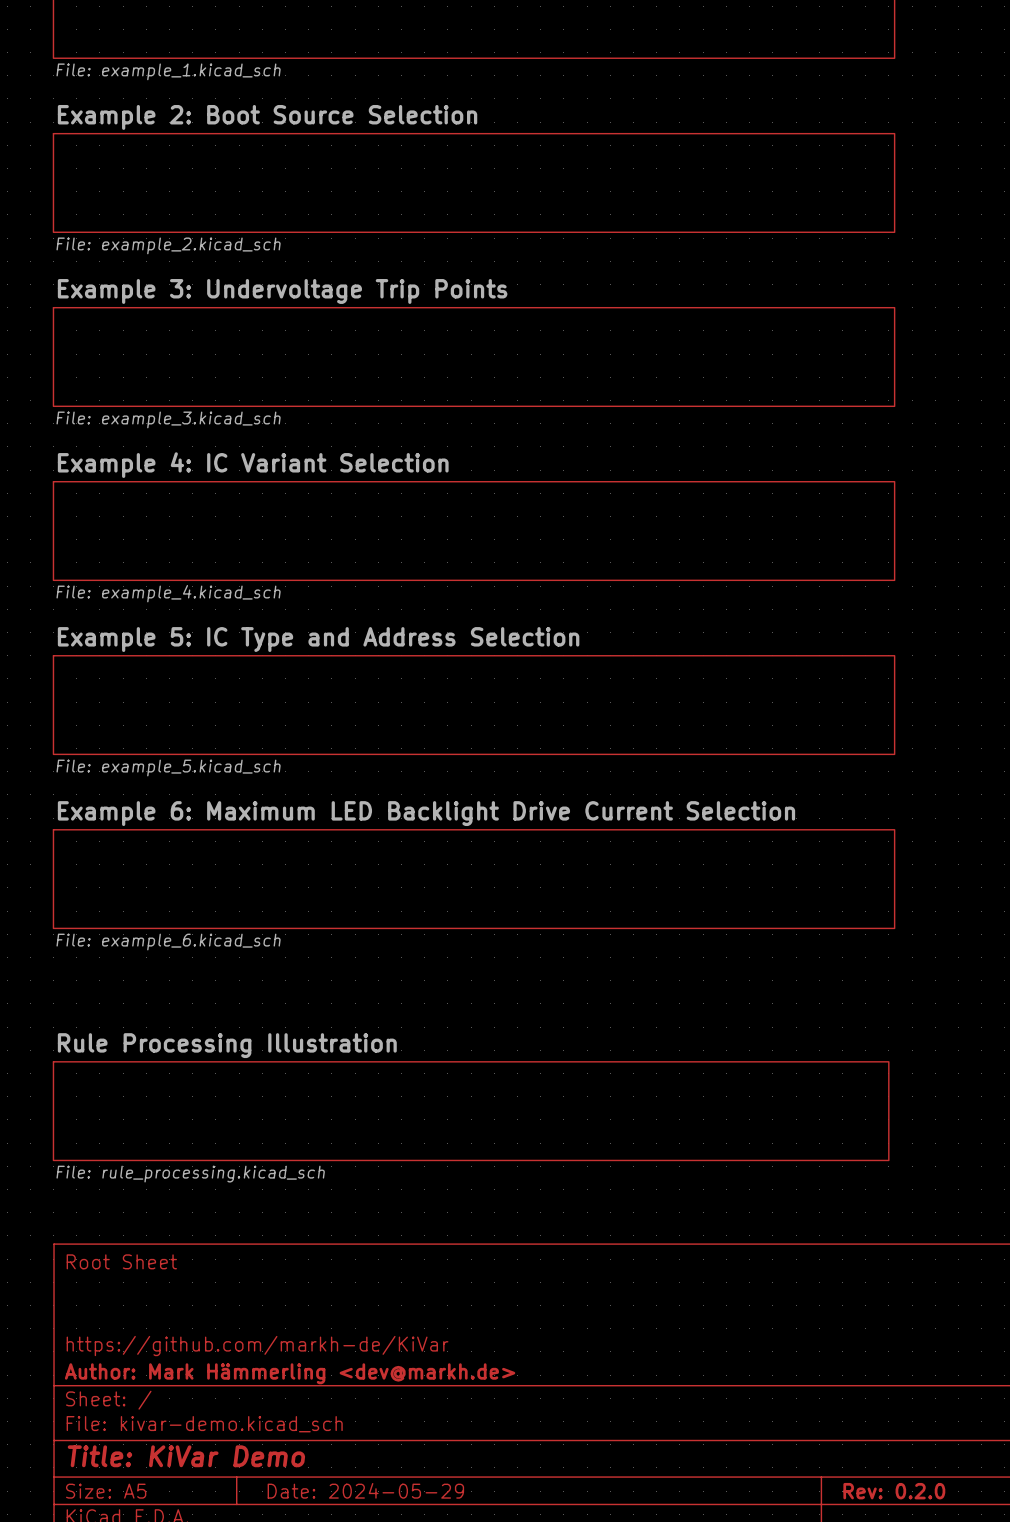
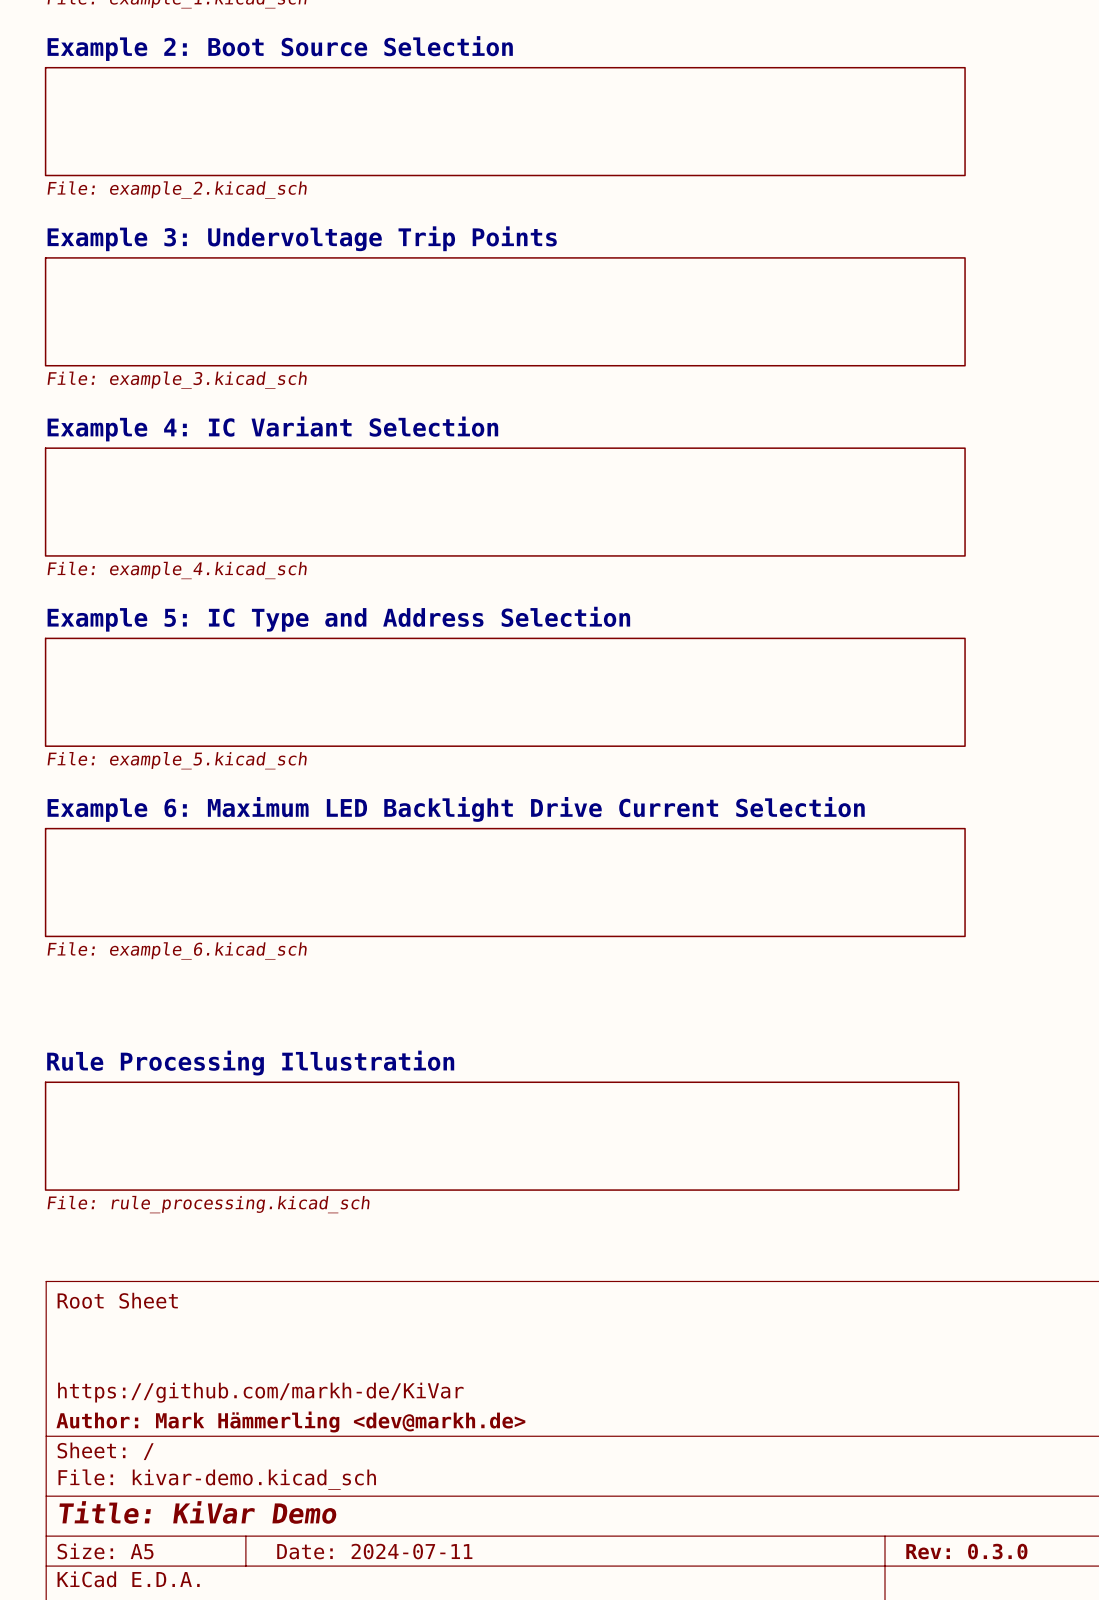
title block: Date: 2024-05-29 (365, 1490) -> Date: 2024-07-11 (374, 1551)
title block: Rev: 0.2.0 (894, 1491) -> Rev: 0.3.0 (966, 1551)

